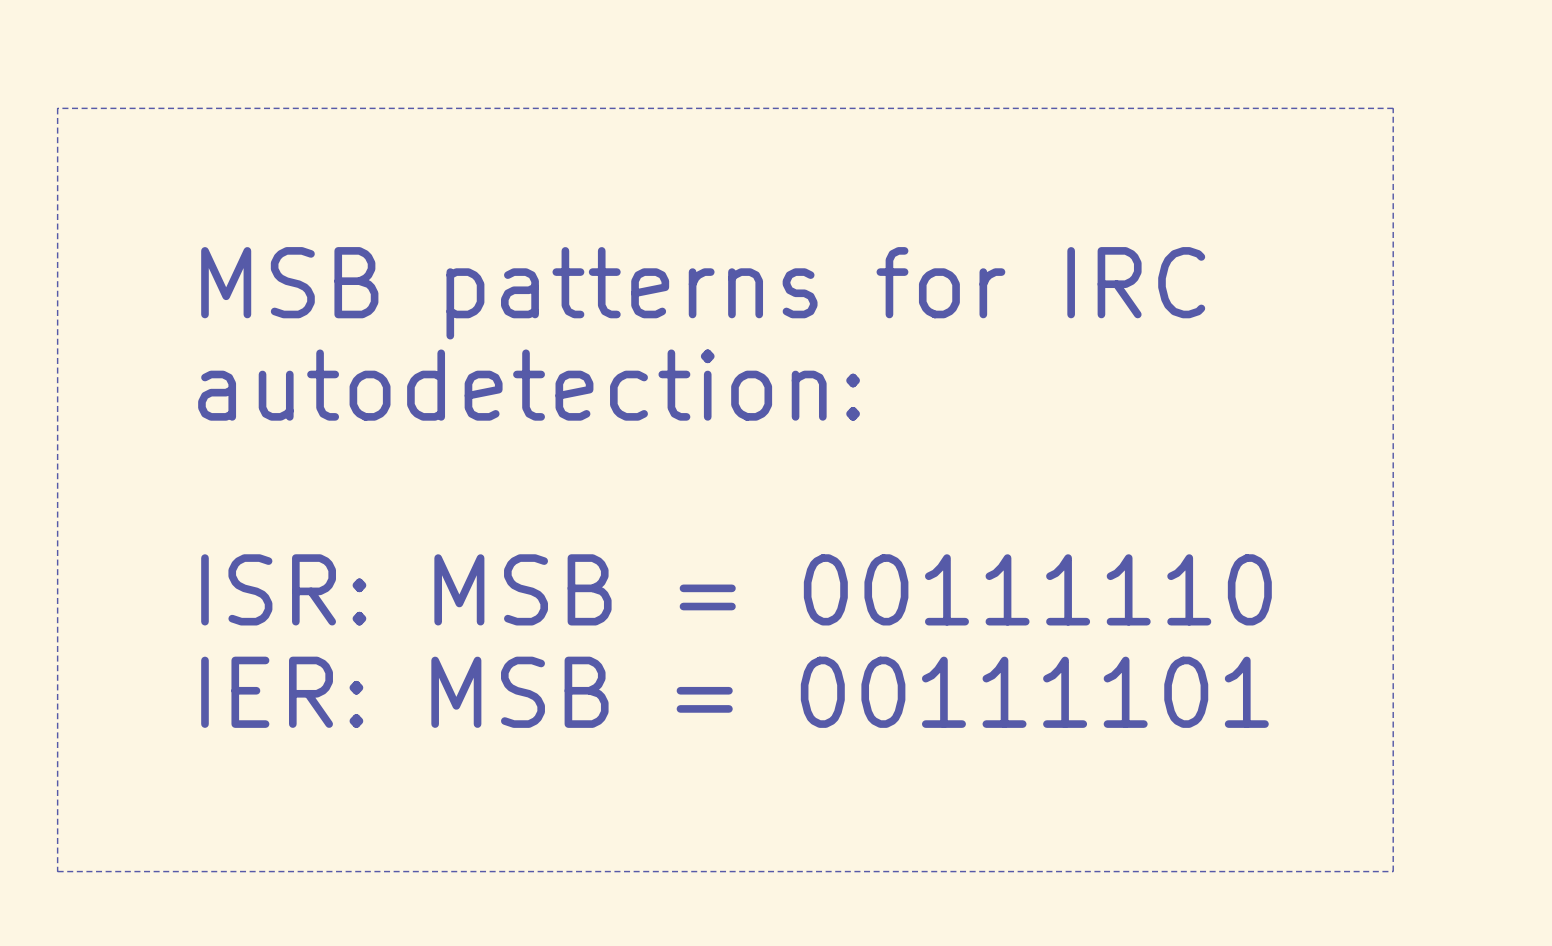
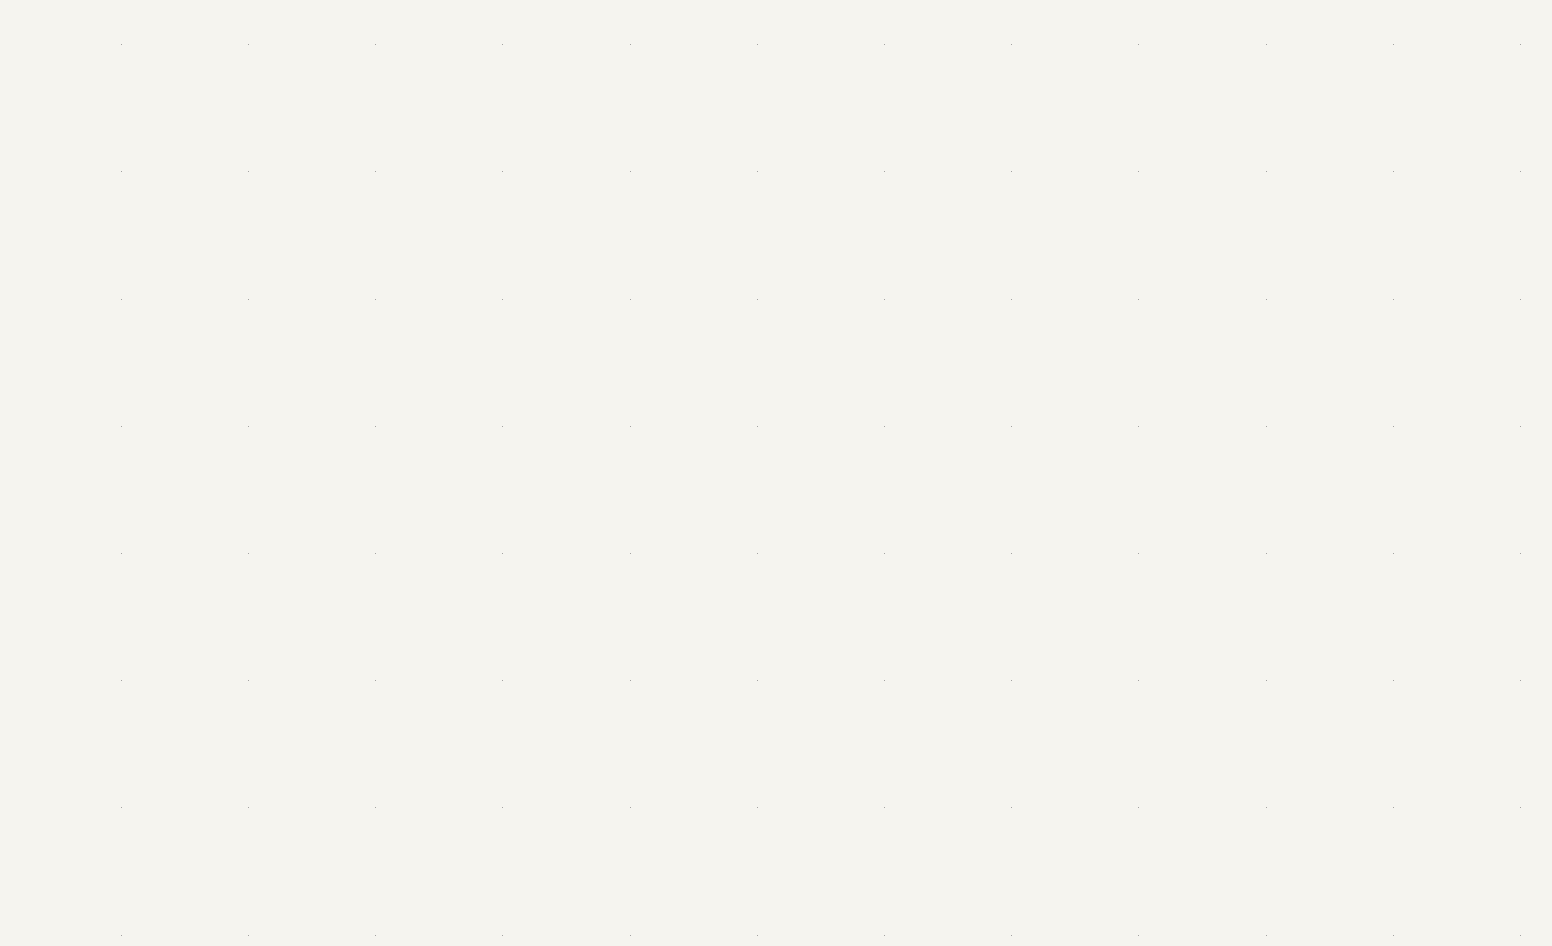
line: (57, 108) (57, 871) (1393, 871) (1393, 108) (57, 108) -> none
text: MSB patterns for IRC (703, 293) -> none
text: autodetection: (529, 385) -> none
text: ISR: MSB = 00111110 (736, 589) -> none
text: IER: MSB = 00111101 (734, 692) -> none

